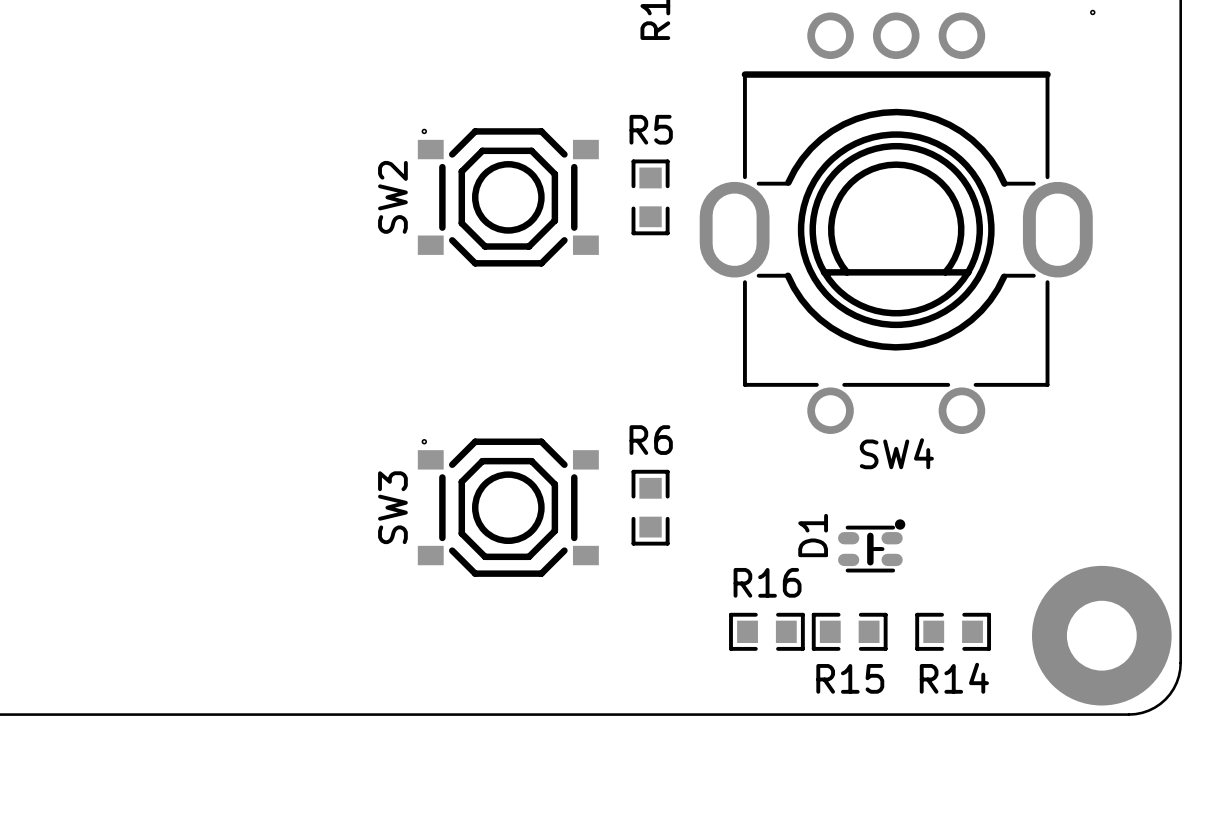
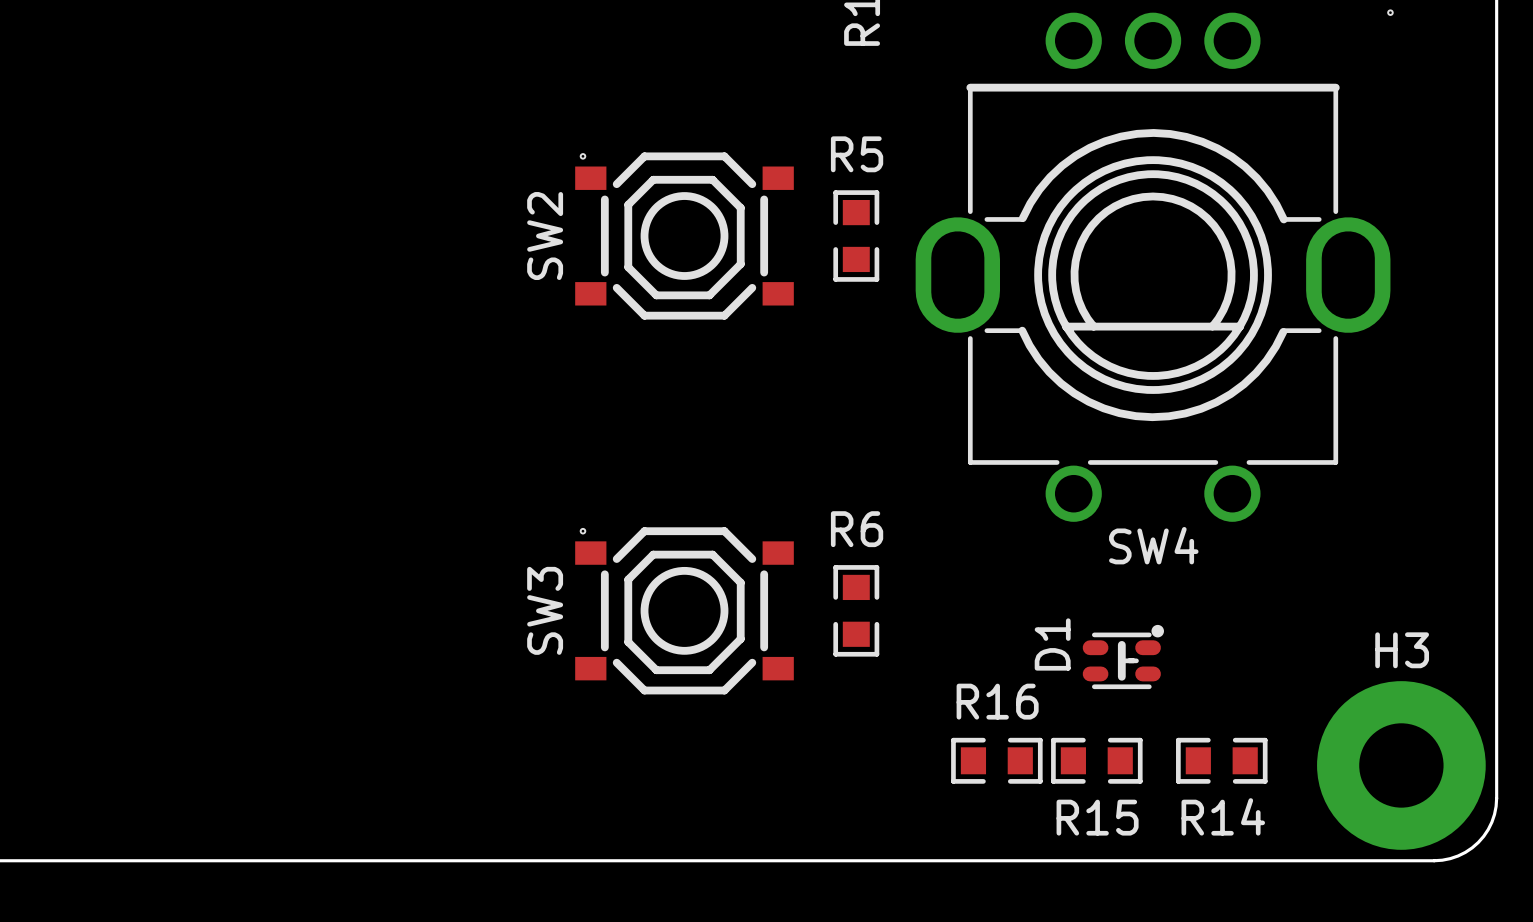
H3 name: none -> H3 (1402, 650)

